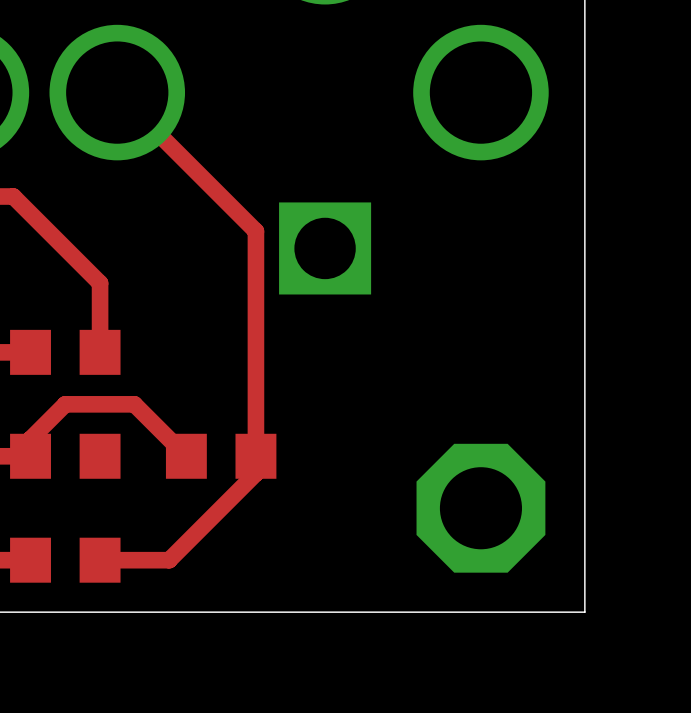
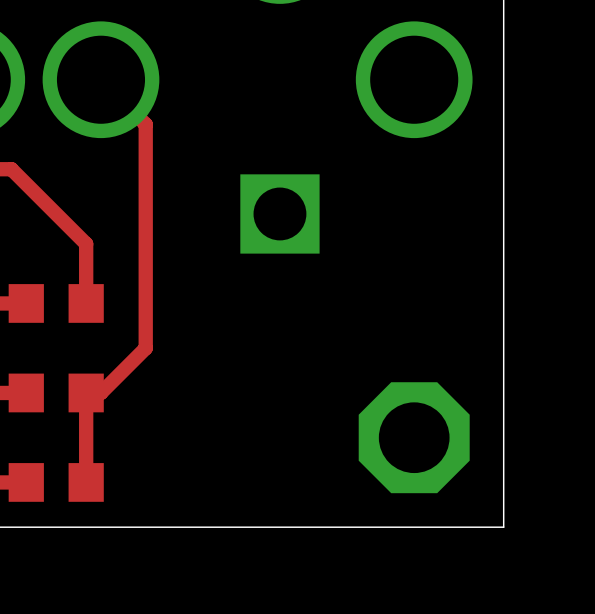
top track: (169, 144) (255, 231) (255, 473) (169, 560) (100, 560) -> (145, 124) (145, 348) (100, 392) (86, 392) (86, 482)
top track: (186, 456) (134, 404) (65, 404) (30, 439) (30, 456) -> none
part: (221, 456) -> none

